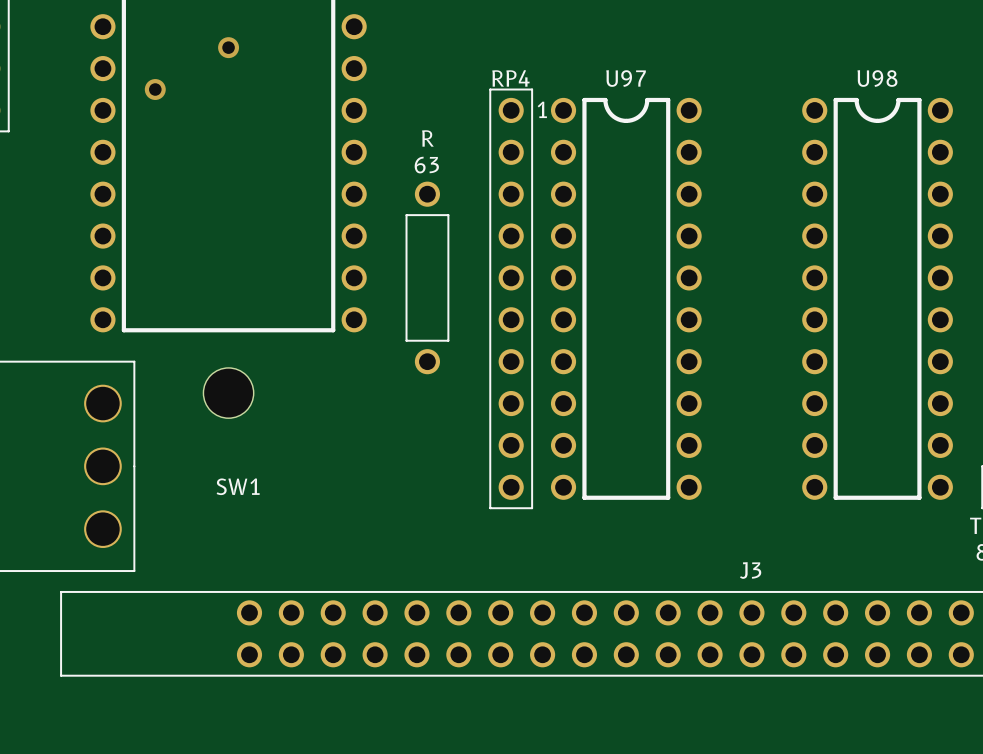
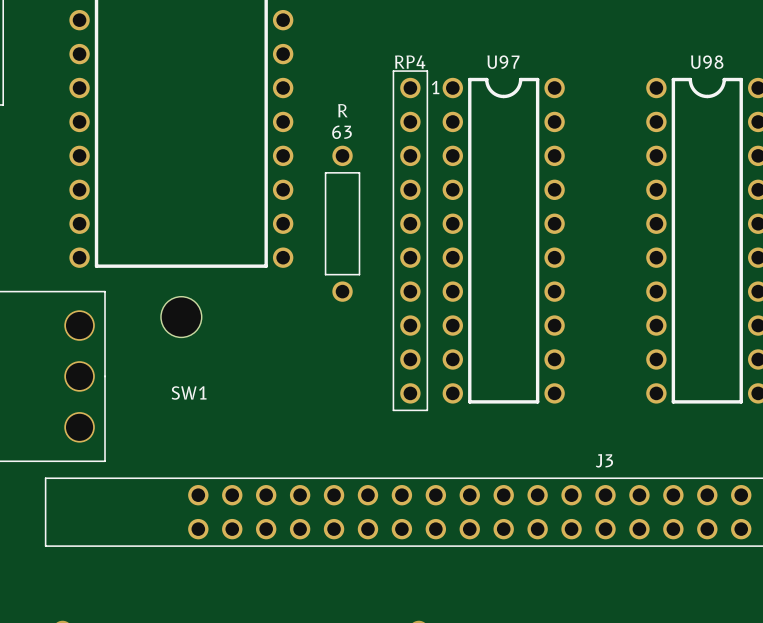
via: (228, 47) -> none
via: (155, 89) -> none

